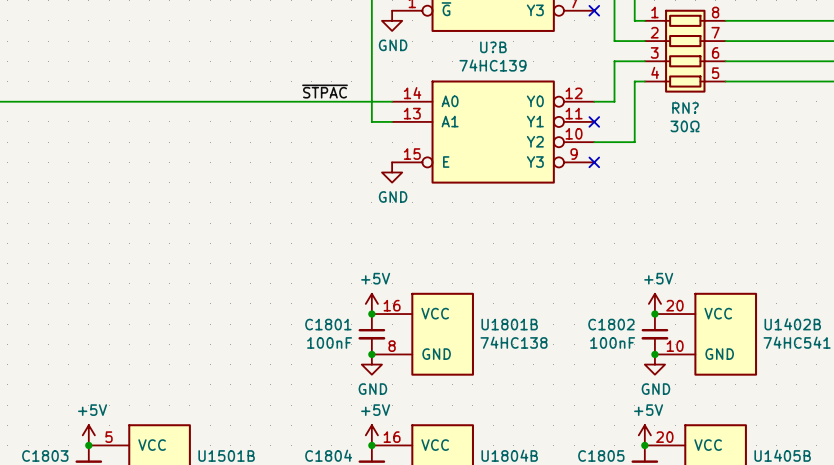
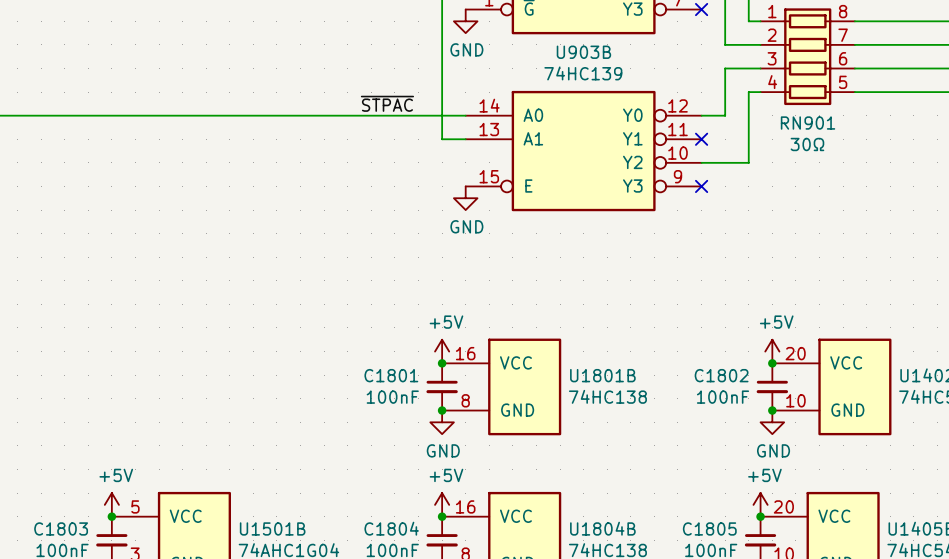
U?B name: U?B (493, 47) -> U903B (583, 52)
RN? name: RN? (685, 108) -> RN901 (808, 123)

